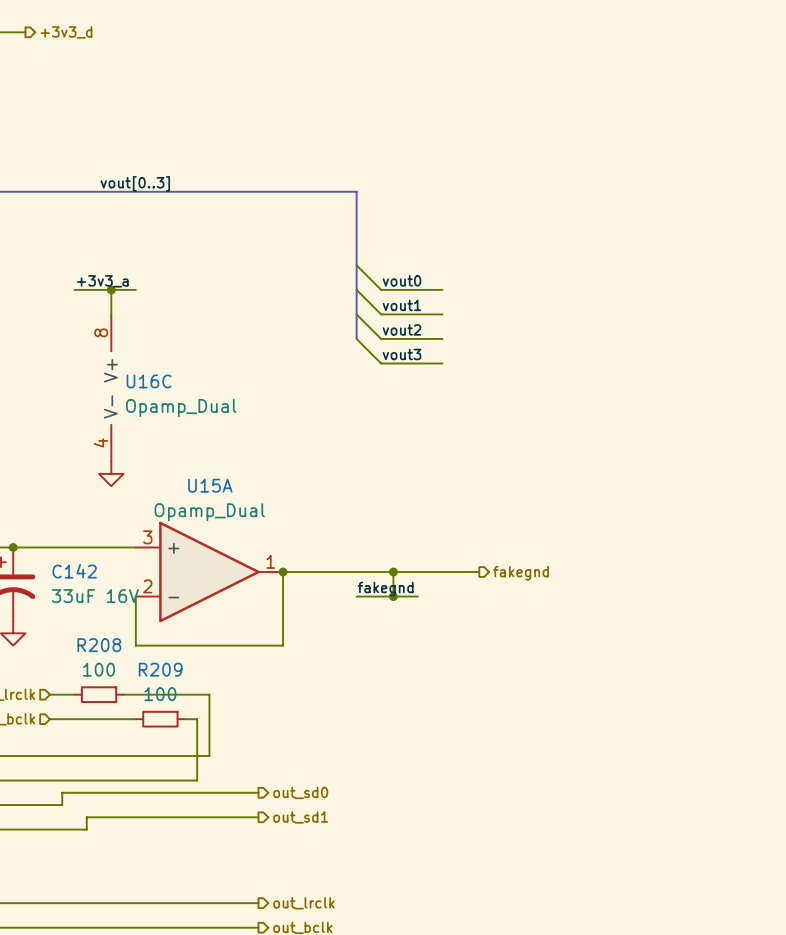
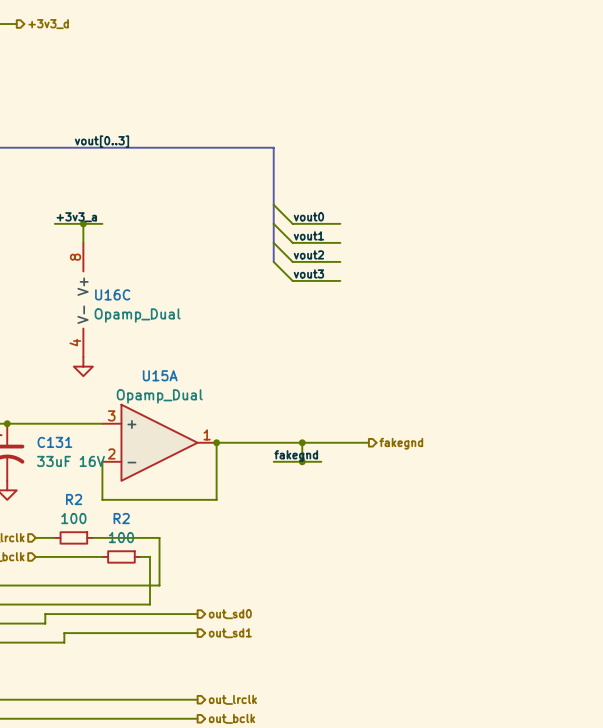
C142 name: C142 (74, 571) -> C131 (54, 442)
R208 name: R208 (99, 645) -> R2 (74, 499)
R209 name: R209 (160, 669) -> R2 (121, 518)

